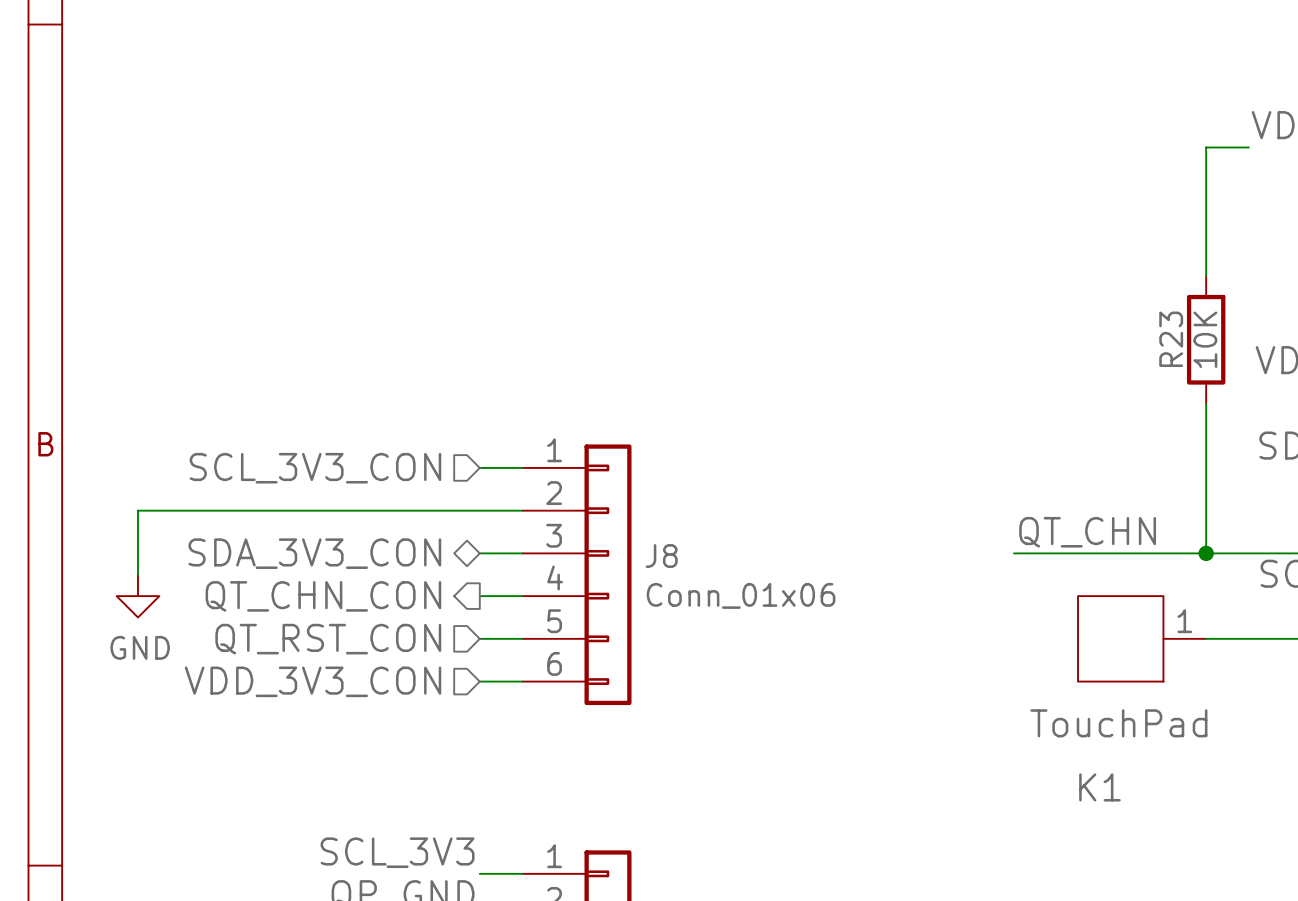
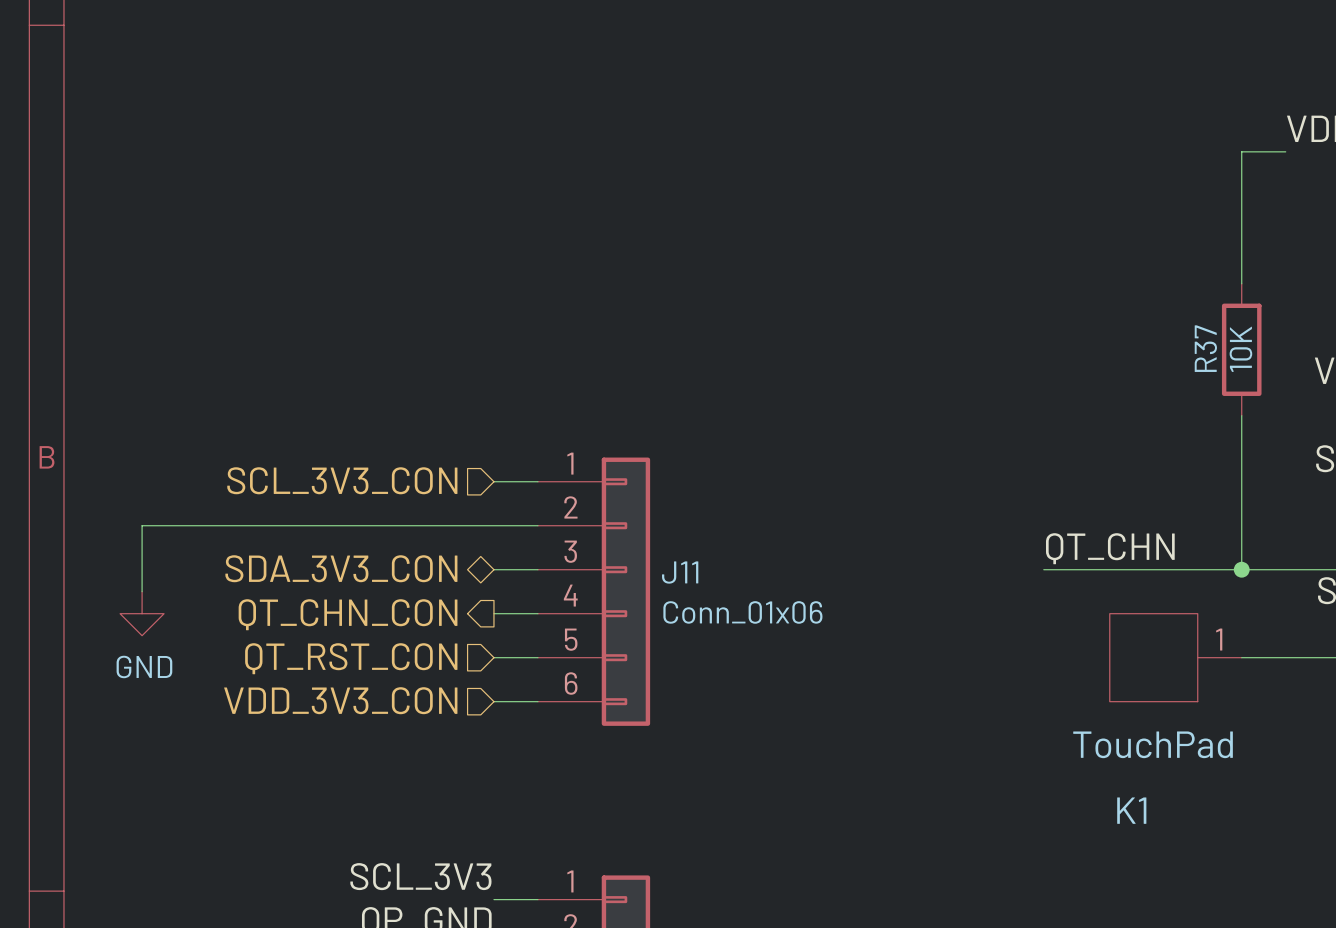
R23 name: R23 (1171, 339) -> R37 (1205, 348)
J8 name: J8 (661, 556) -> J11 (680, 572)

